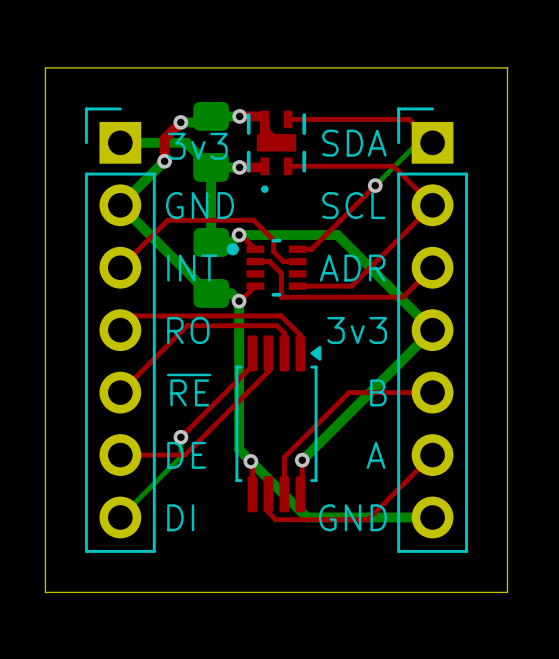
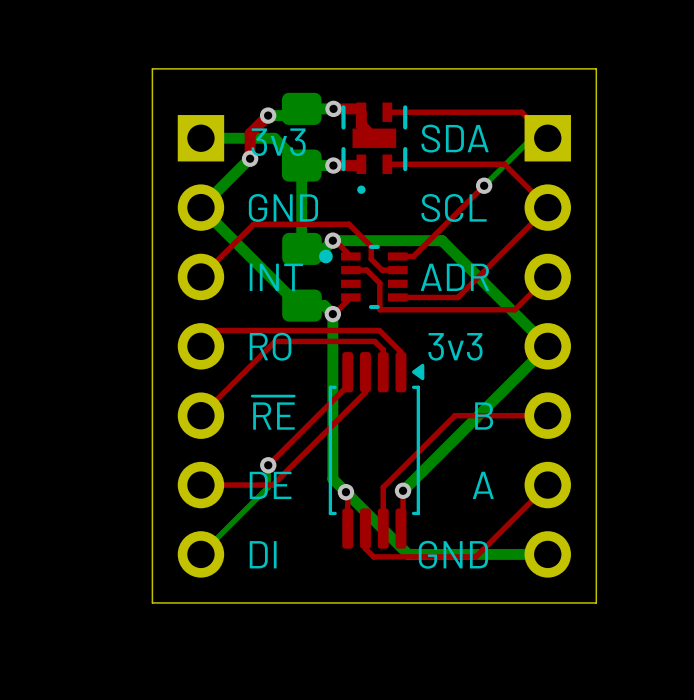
board edge: (45, 67) (507, 67) (507, 592) (45, 592) (45, 67) -> (152, 68) (152, 602) (596, 602) (596, 68) (152, 68)
part side: top (120, 330) -> bottom (200, 346)
part side: top (432, 330) -> bottom (547, 346)

